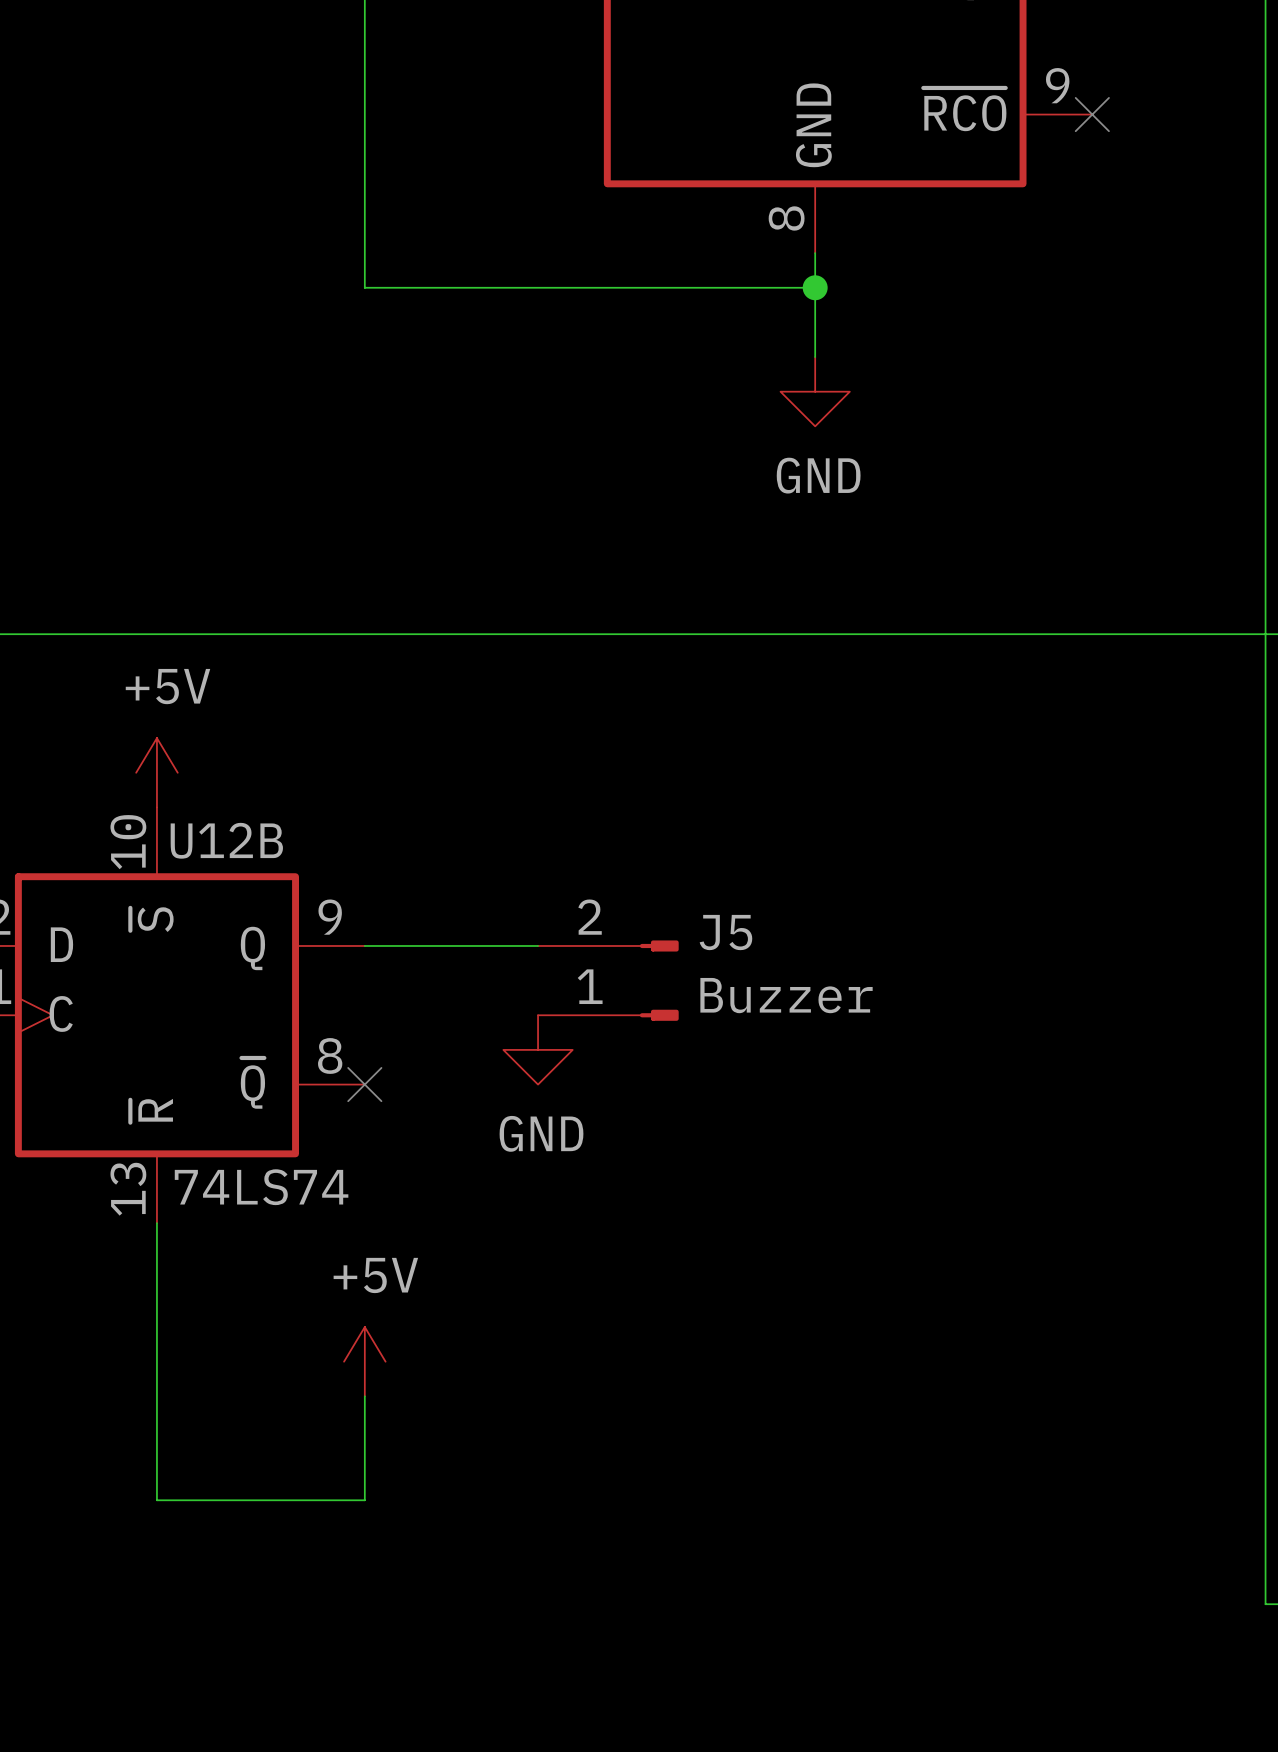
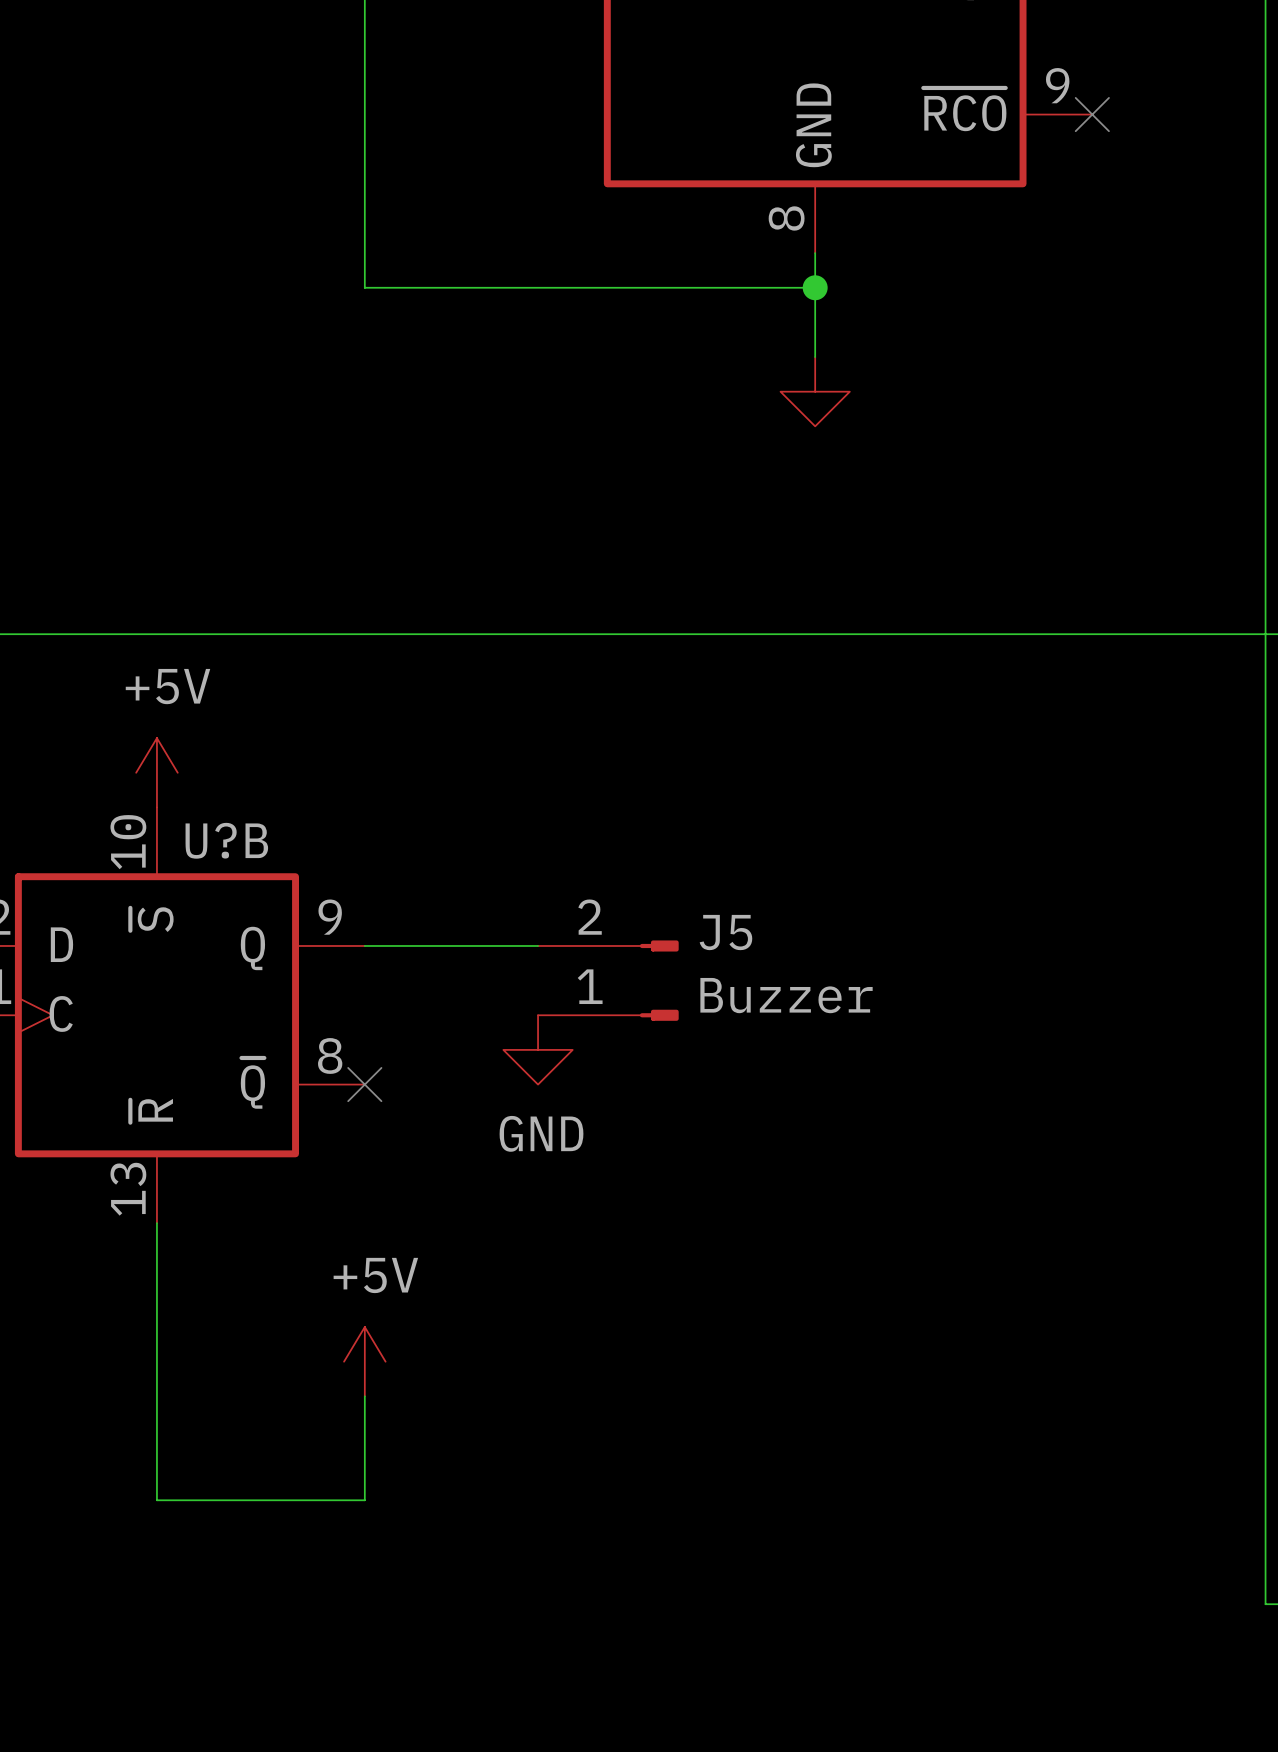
power symbol text: GND (818, 475) -> none
U12B name: U12B (226, 840) -> U?B (226, 840)
U12B value: 74LS74 (261, 1187) -> none

